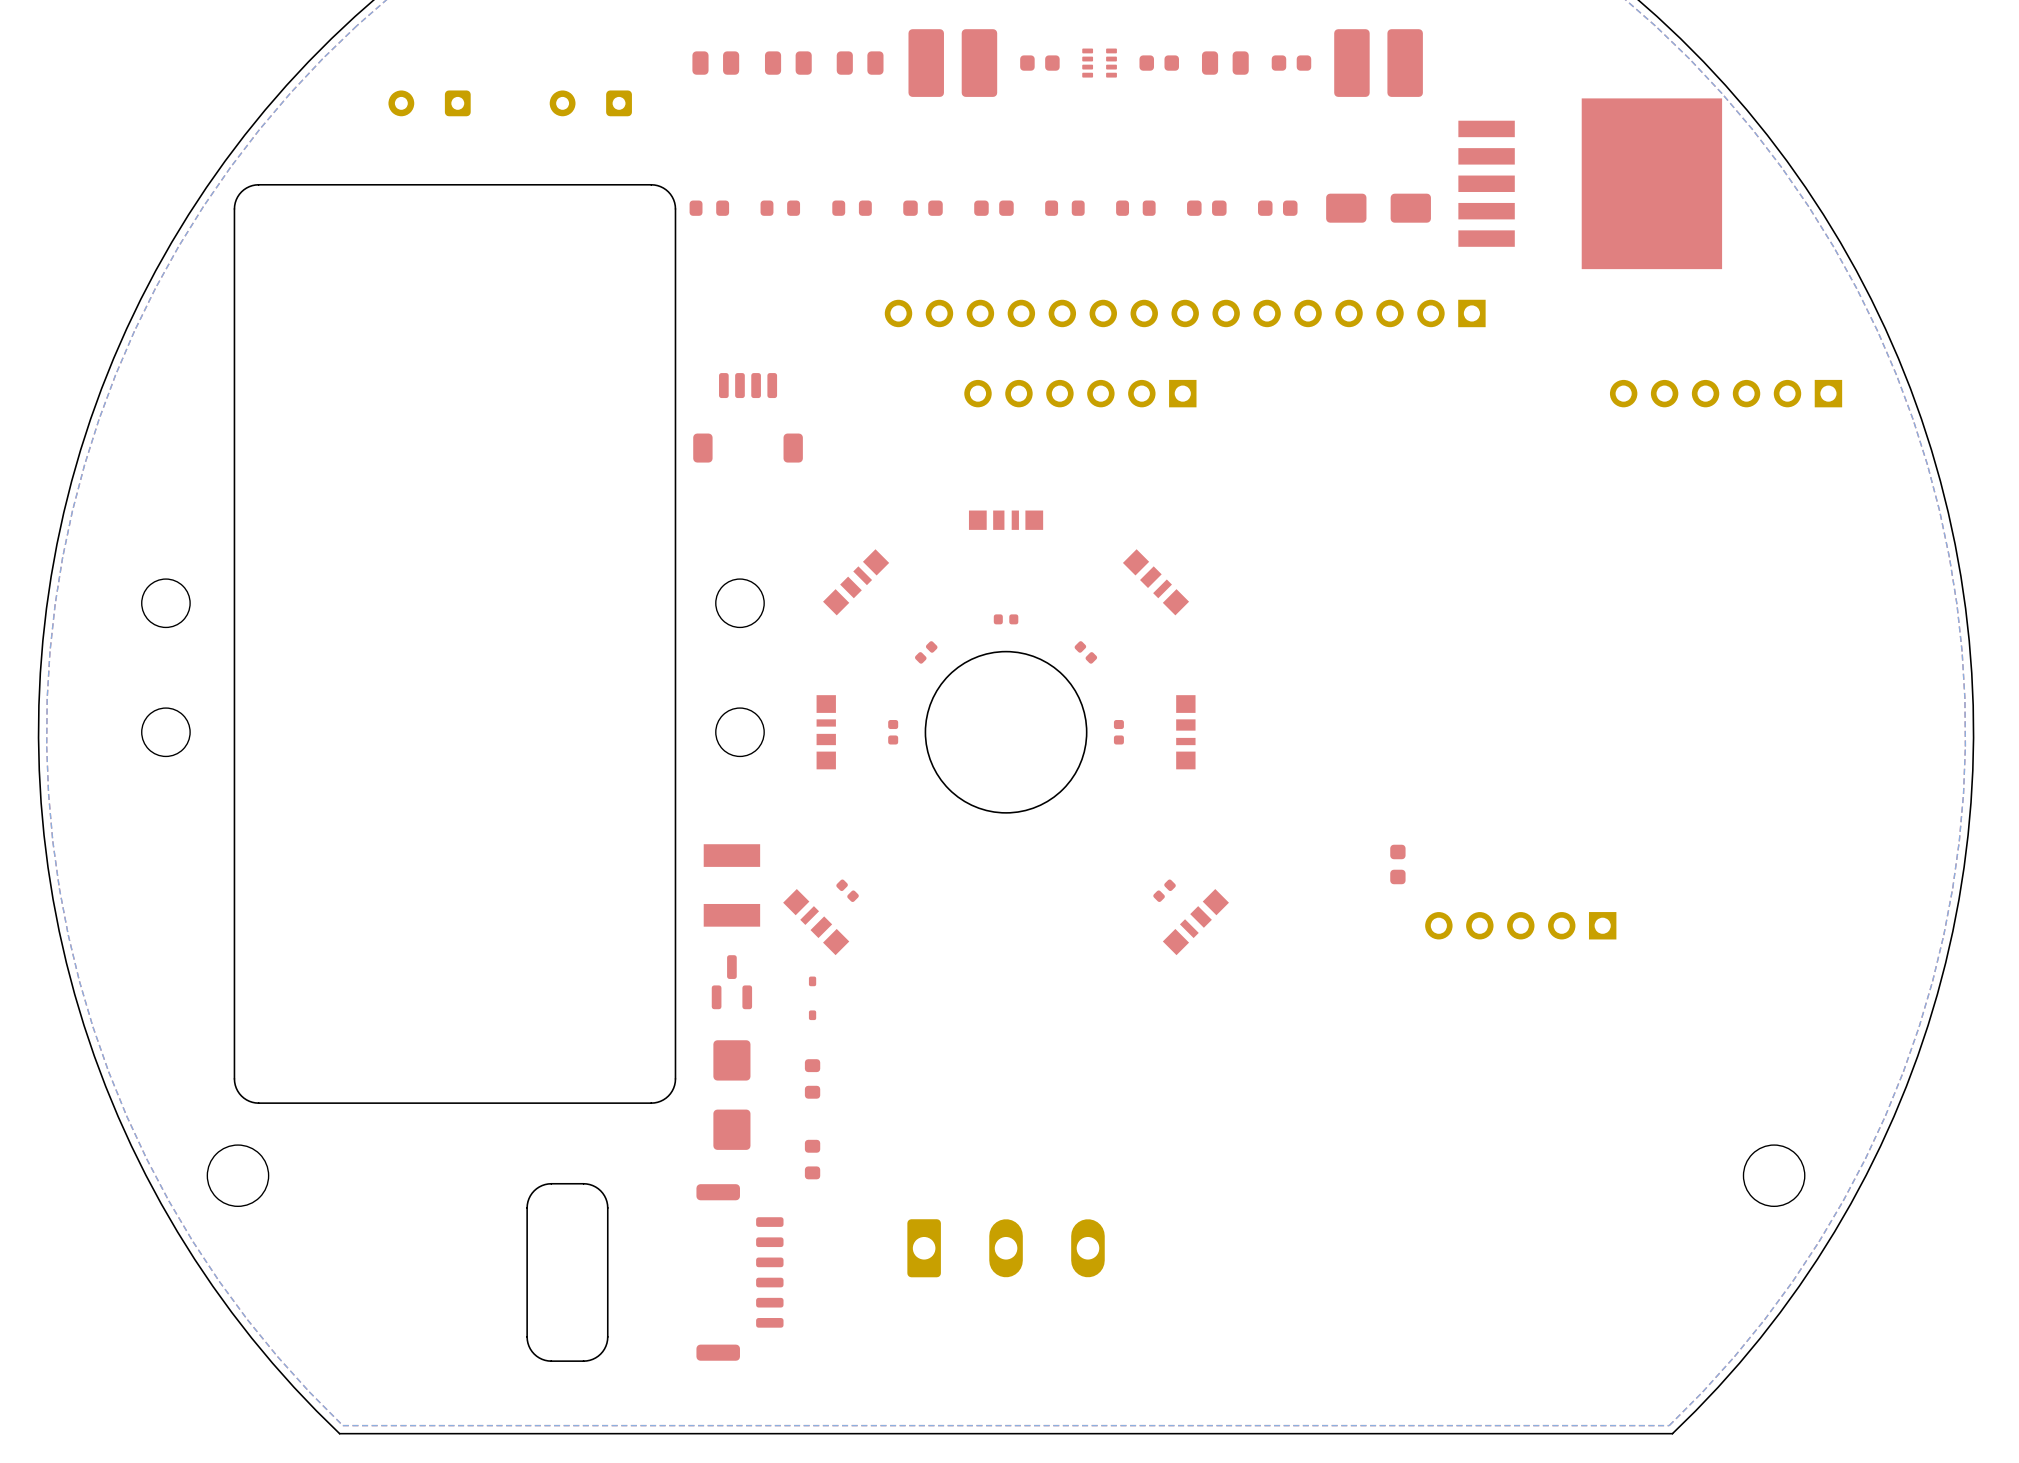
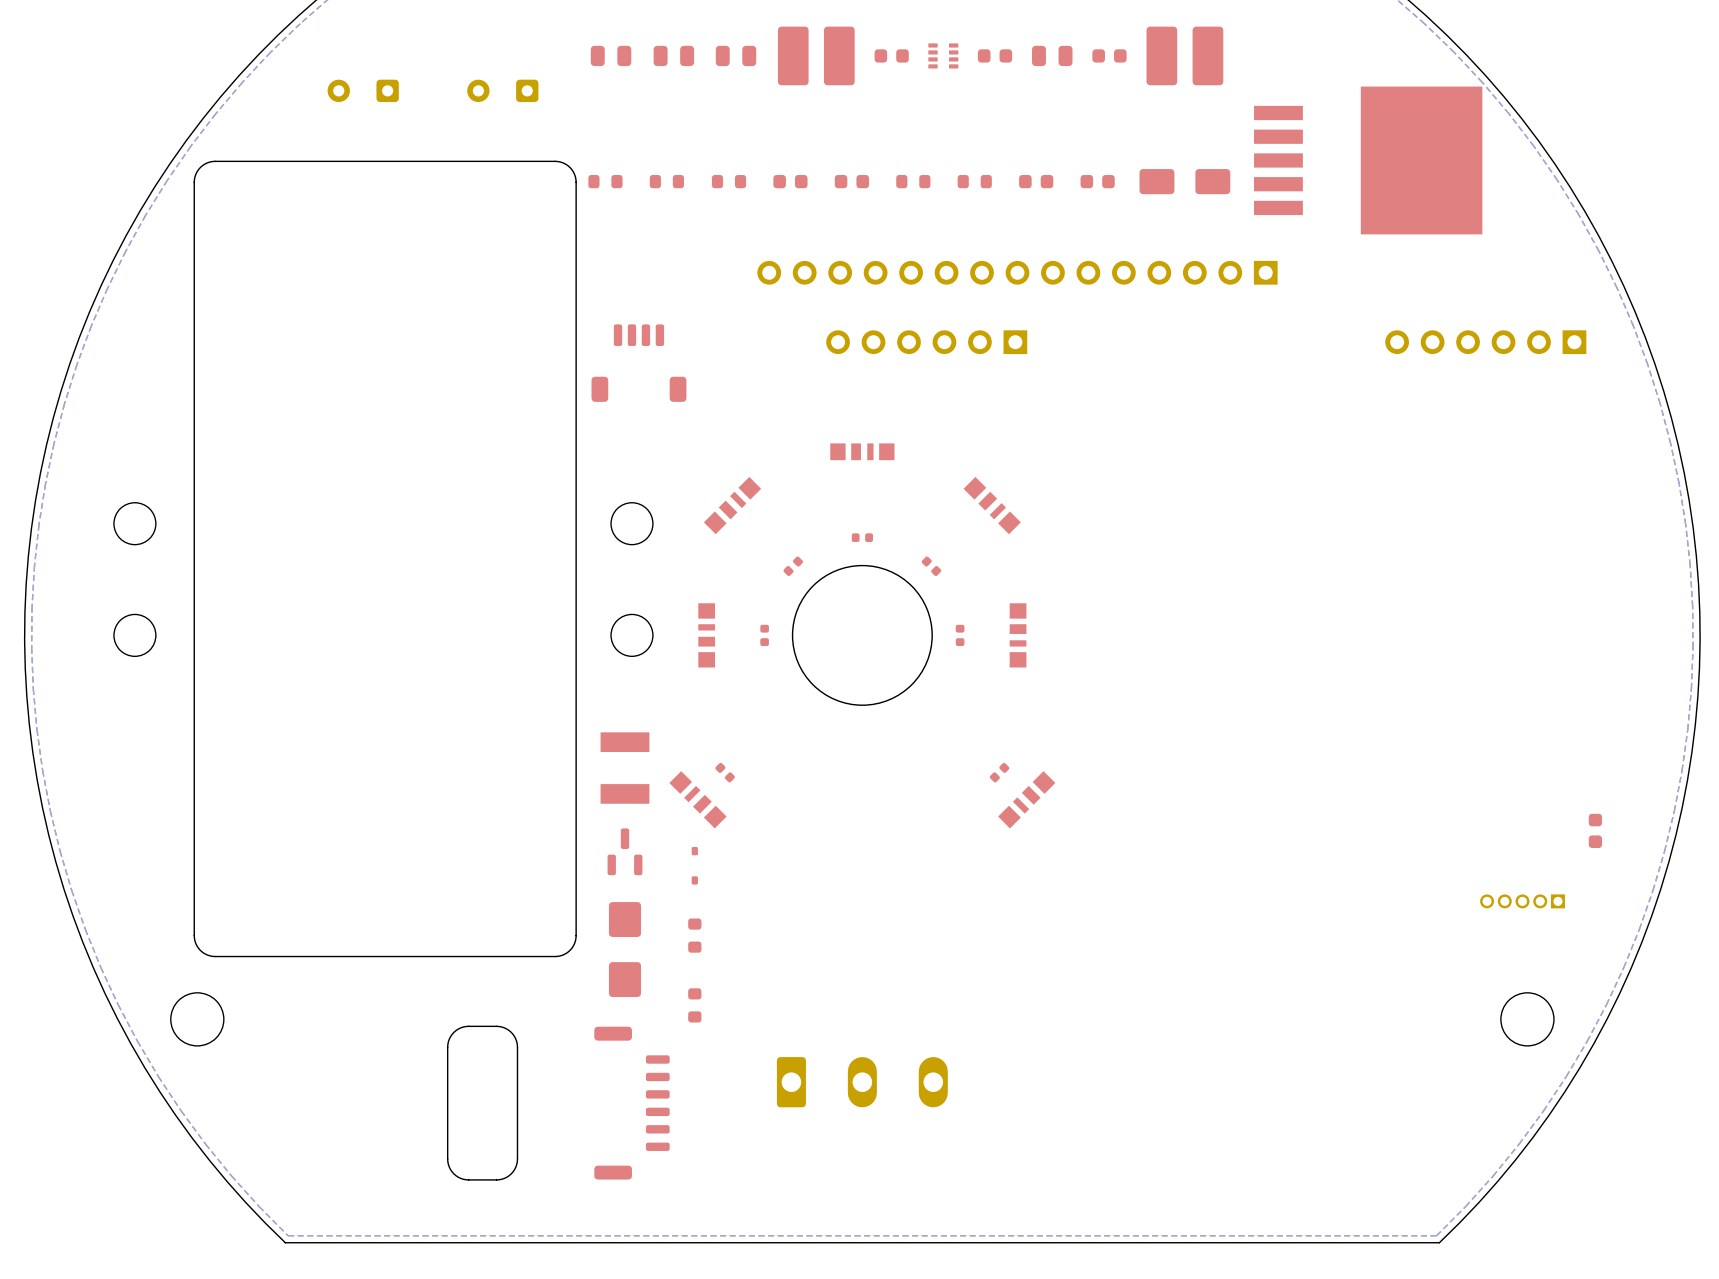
part: (1397, 864) -> none
part: (1520, 925) -> none
part: none -> (1595, 830)
part: none -> (1522, 901)

